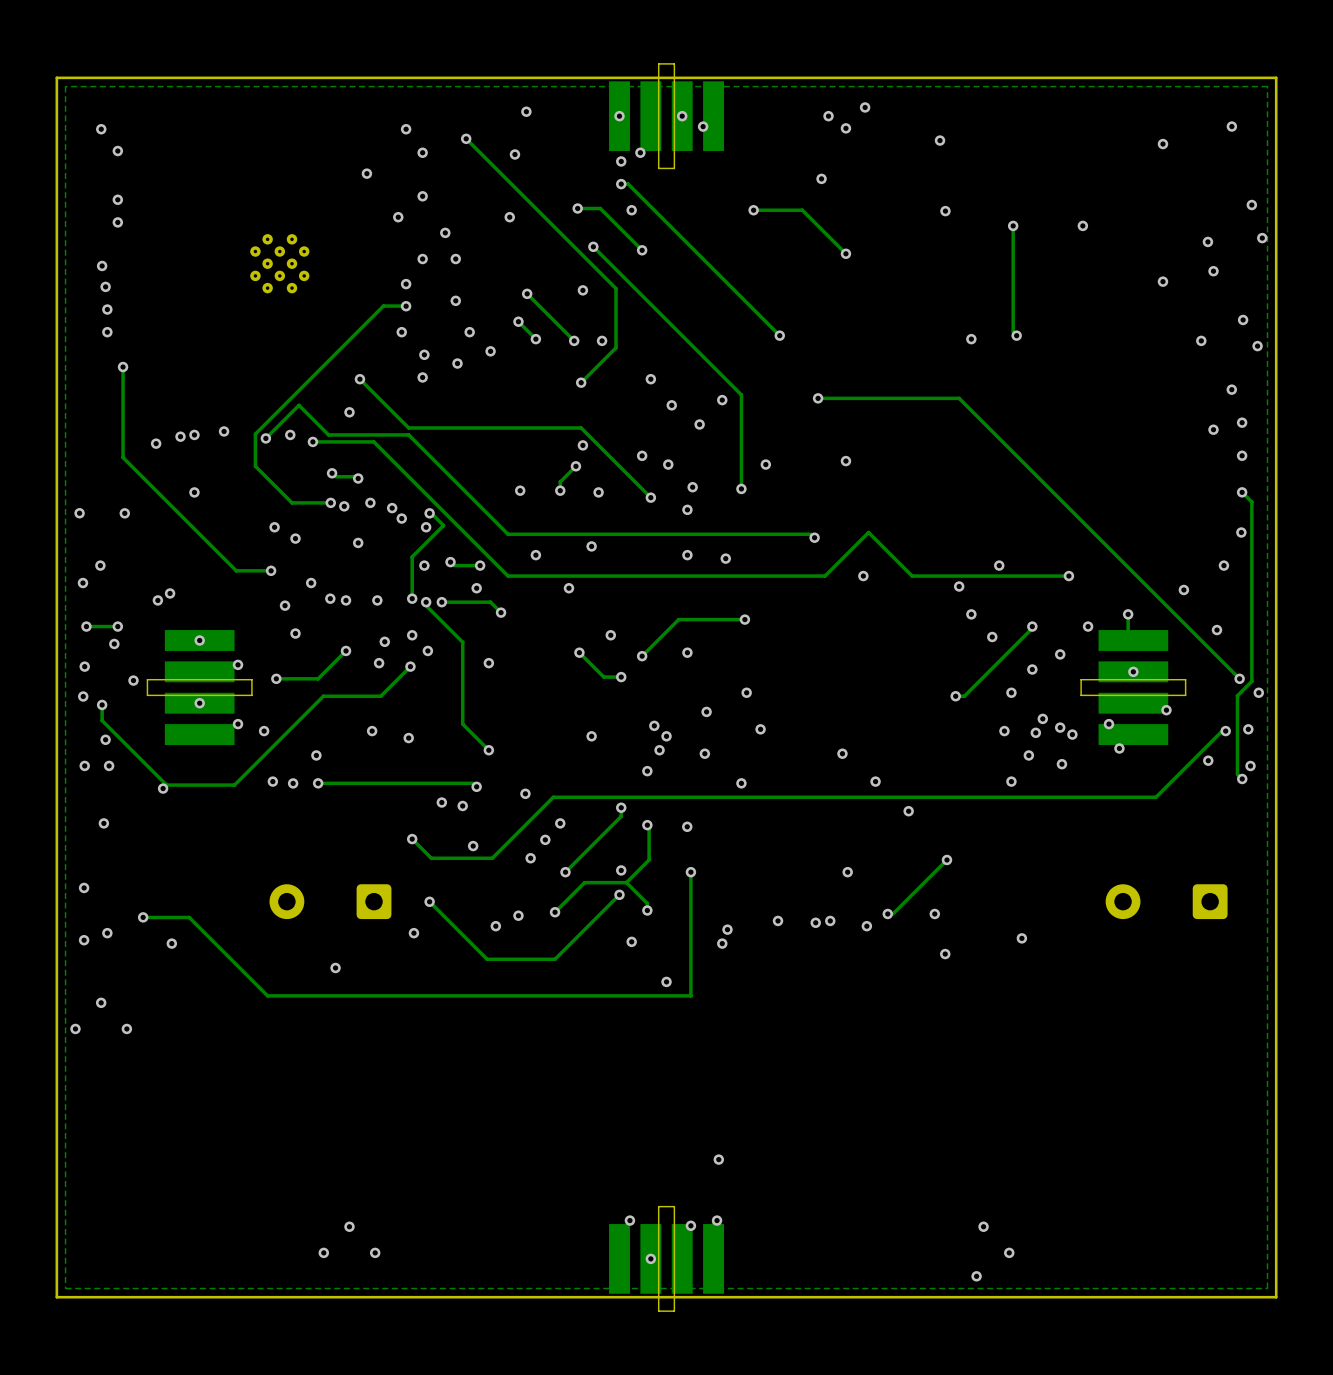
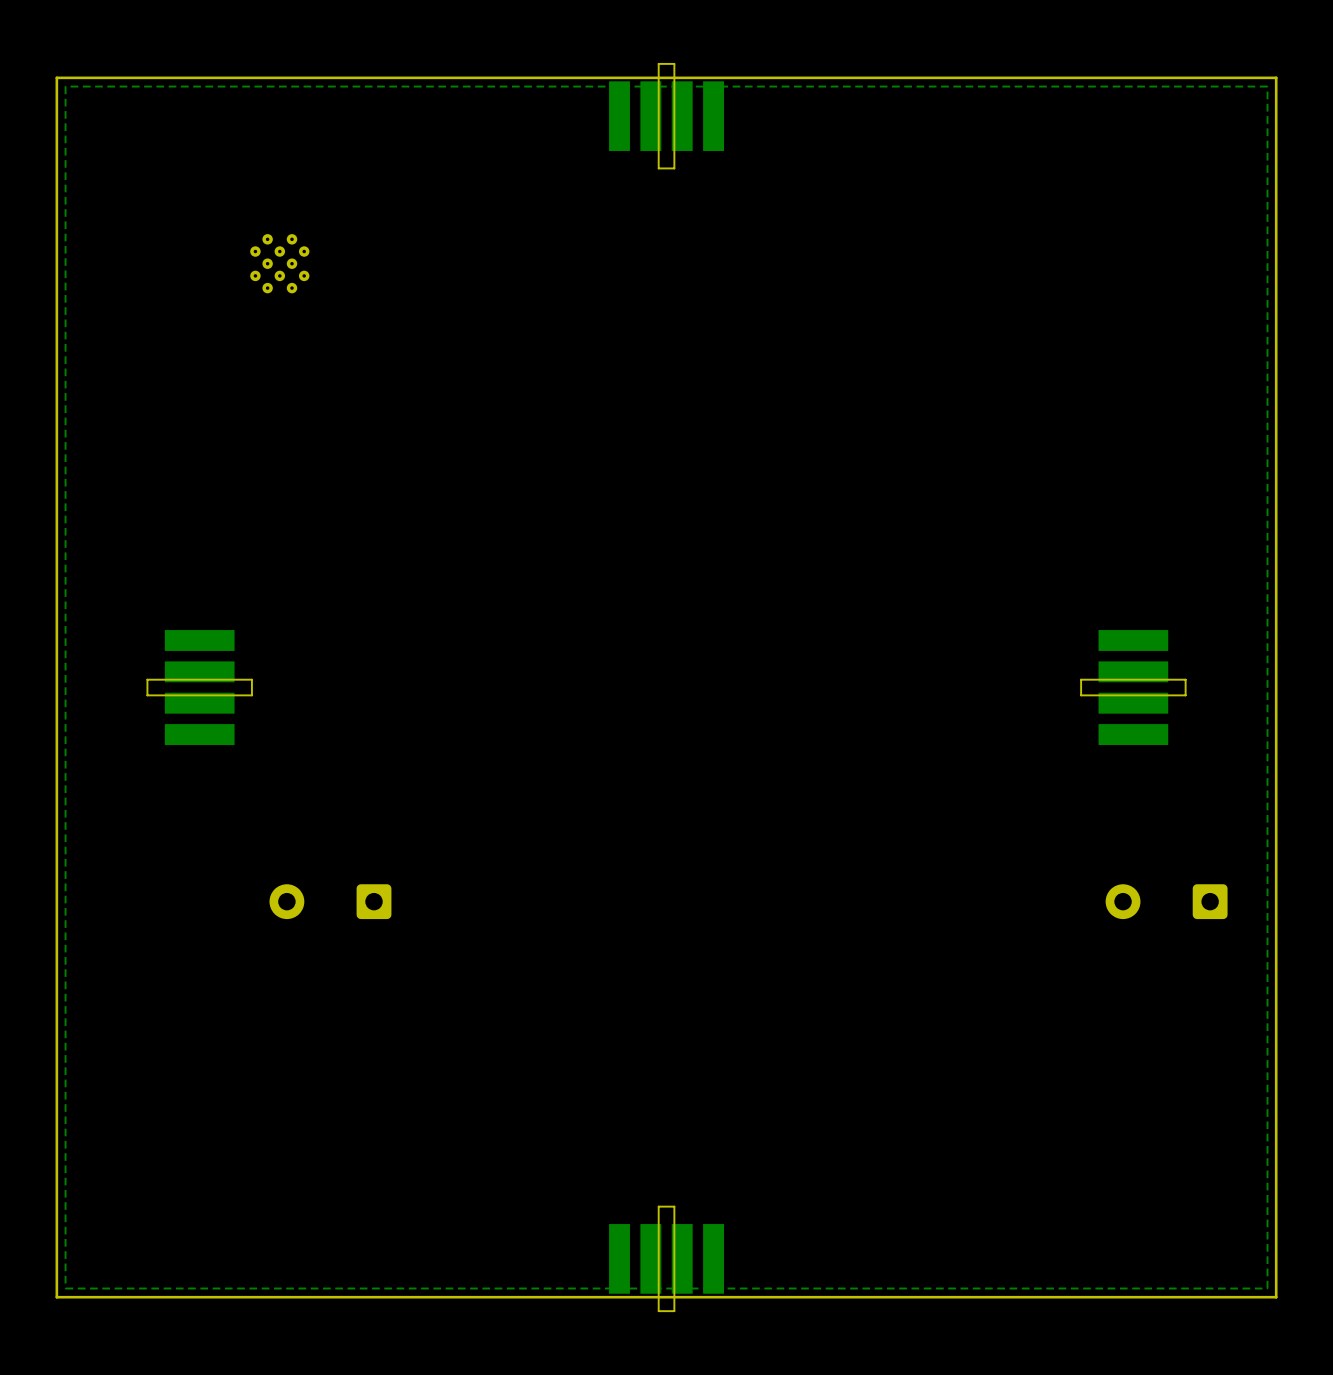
via: (865, 107) -> none
via: (526, 111) -> none
via: (619, 116) -> none
via: (682, 116) -> none
via: (828, 116) -> none
via: (703, 126) -> none
via: (1231, 126) -> none
via: (845, 128) -> none
via: (101, 129) -> none
via: (406, 129) -> none
track: (466, 138) (616, 288) (616, 347) (581, 382) -> none
via: (466, 138) -> none
via: (940, 140) -> none
via: (1162, 144) -> none
via: (117, 151) -> none
via: (422, 152) -> none
via: (640, 152) -> none
via: (514, 154) -> none
via: (621, 161) -> none
via: (366, 173) -> none
via: (821, 178) -> none
track: (621, 184) (628, 184) (779, 335) -> none
via: (621, 184) -> none
via: (422, 196) -> none
via: (117, 199) -> none
via: (1251, 205) -> none
track: (577, 208) (600, 208) (642, 250) -> none
via: (577, 208) -> none
via: (631, 210) -> none
track: (753, 210) (802, 210) (845, 253) -> none
via: (753, 210) -> none
via: (945, 211) -> none
via: (398, 217) -> none
via: (509, 217) -> none
via: (117, 222) -> none
track: (1013, 225) (1013, 332) -> none
via: (1013, 225) -> none
via: (1082, 225) -> none
via: (445, 232) -> none
via: (1262, 238) -> none
via: (1207, 241) -> none
track: (593, 246) (741, 394) (741, 488) -> none
via: (593, 246) -> none
via: (642, 250) -> none
via: (845, 253) -> none
via: (422, 259) -> none
via: (455, 259) -> none
via: (102, 265) -> none
via: (1213, 271) -> none
via: (1162, 281) -> none
via: (406, 284) -> none
via: (105, 286) -> none
via: (582, 290) -> none
track: (527, 293) (574, 340) -> none
via: (527, 293) -> none
via: (455, 300) -> none
track: (406, 306) (383, 306) (255, 434) (255, 466) (292, 502) (330, 502) -> none
via: (406, 306) -> none
via: (107, 309) -> none
via: (1243, 319) -> none
track: (518, 321) (535, 339) -> none
via: (518, 321) -> none
via: (107, 332) -> none
via: (401, 332) -> none
via: (469, 332) -> none
via: (779, 335) -> none
via: (1016, 335) -> none
via: (535, 339) -> none
via: (971, 339) -> none
via: (574, 340) -> none
via: (602, 340) -> none
via: (1201, 340) -> none
via: (1257, 346) -> none
via: (490, 351) -> none
via: (424, 354) -> none
via: (457, 363) -> none
track: (123, 367) (123, 457) (236, 570) (271, 570) -> none
via: (123, 367) -> none
via: (422, 377) -> none
track: (359, 379) (408, 427) (581, 427) (650, 497) -> none
via: (359, 379) -> none
via: (650, 379) -> none
via: (581, 382) -> none
via: (1231, 389) -> none
track: (818, 398) (959, 398) (1239, 678) -> none
via: (818, 398) -> none
via: (722, 400) -> none
via: (671, 405) -> none
via: (349, 412) -> none
via: (1242, 422) -> none
via: (699, 424) -> none
via: (1213, 429) -> none
via: (224, 431) -> none
via: (194, 434) -> none
via: (290, 434) -> none
via: (180, 436) -> none
track: (265, 438) (298, 405) (328, 434) (408, 434) (508, 534) (811, 534) -> none
via: (265, 438) -> none
via: (312, 441) -> none
track: (314, 441) (373, 441) (508, 576) (825, 576) (868, 532) (912, 576) (1068, 576) -> none
via: (156, 443) -> none
via: (582, 445) -> none
via: (642, 455) -> none
via: (1242, 455) -> none
via: (845, 461) -> none
via: (668, 464) -> none
via: (765, 464) -> none
track: (575, 466) (560, 481) (560, 490) -> none
via: (575, 466) -> none
via: (332, 473) -> none
track: (356, 476) (335, 476) -> none
via: (358, 478) -> none
via: (692, 487) -> none
via: (741, 488) -> none
via: (520, 490) -> none
via: (560, 490) -> none
via: (194, 492) -> none
via: (598, 492) -> none
track: (1242, 492) (1251, 502) (1251, 681) (1237, 695) (1237, 774) (1242, 778) -> none
via: (1242, 492) -> none
via: (650, 497) -> none
via: (330, 502) -> none
via: (370, 502) -> none
via: (344, 506) -> none
via: (392, 508) -> none
via: (687, 509) -> none
via: (79, 513) -> none
via: (124, 513) -> none
via: (429, 513) -> none
track: (431, 513) (443, 525) (412, 556) (412, 598) -> none
via: (401, 518) -> none
via: (274, 527) -> none
via: (426, 527) -> none
via: (1241, 532) -> none
via: (814, 537) -> none
via: (295, 538) -> none
via: (358, 542) -> none
via: (591, 546) -> none
via: (535, 555) -> none
via: (687, 555) -> none
via: (725, 558) -> none
via: (450, 562) -> none
via: (100, 565) -> none
via: (424, 565) -> none
track: (480, 565) (454, 565) -> none
via: (480, 565) -> none
via: (999, 565) -> none
via: (1223, 565) -> none
via: (271, 570) -> none
via: (863, 576) -> none
via: (1068, 576) -> none
via: (82, 583) -> none
via: (311, 583) -> none
via: (959, 586) -> none
via: (476, 588) -> none
via: (568, 588) -> none
via: (1183, 589) -> none
via: (170, 593) -> none
via: (330, 598) -> none
via: (412, 598) -> none
via: (157, 600) -> none
via: (346, 600) -> none
via: (377, 600) -> none
via: (426, 602) -> none
track: (441, 602) (490, 602) (501, 612) -> none
via: (441, 602) -> none
via: (285, 605) -> none
track: (426, 605) (462, 642) (462, 724) (488, 750) -> none
via: (501, 612) -> none
via: (971, 614) -> none
track: (1128, 614) (1128, 635) -> none
via: (1128, 614) -> none
track: (744, 619) (678, 619) (642, 656) -> none
via: (744, 619) -> none
via: (86, 626) -> none
track: (117, 626) (86, 626) -> none
via: (117, 626) -> none
via: (1032, 626) -> none
via: (1088, 626) -> none
track: (1032, 628) (964, 696) (955, 696) -> none
via: (1216, 630) -> none
via: (295, 633) -> none
via: (412, 635) -> none
via: (610, 635) -> none
via: (992, 637) -> none
via: (199, 640) -> none
via: (384, 641) -> none
via: (114, 643) -> none
track: (346, 650) (318, 678) (276, 678) -> none
via: (346, 650) -> none
via: (427, 650) -> none
track: (579, 652) (603, 677) (621, 677) -> none
via: (579, 652) -> none
via: (687, 652) -> none
via: (1060, 654) -> none
via: (642, 656) -> none
via: (379, 663) -> none
via: (488, 663) -> none
via: (238, 664) -> none
via: (84, 666) -> none
track: (410, 666) (380, 696) (323, 696) (234, 785) (166, 785) (102, 720) (102, 704) -> none
via: (410, 666) -> none
via: (1032, 669) -> none
via: (1133, 671) -> none
via: (621, 677) -> none
via: (276, 678) -> none
via: (1239, 678) -> none
via: (133, 680) -> none
via: (746, 692) -> none
via: (1011, 692) -> none
via: (1258, 692) -> none
via: (83, 696) -> none
via: (955, 696) -> none
via: (199, 703) -> none
via: (102, 704) -> none
via: (1166, 710) -> none
via: (706, 711) -> none
via: (1042, 718) -> none
via: (238, 724) -> none
via: (1108, 724) -> none
via: (654, 725) -> none
via: (1060, 727) -> none
via: (760, 729) -> none
via: (1248, 729) -> none
via: (264, 731) -> none
via: (372, 731) -> none
via: (1004, 731) -> none
track: (1222, 731) (1156, 797) (553, 797) (492, 858) (431, 858) (412, 839) -> none
via: (1225, 731) -> none
via: (1035, 732) -> none
via: (1072, 734) -> none
via: (591, 736) -> none
via: (666, 736) -> none
via: (408, 738) -> none
via: (105, 739) -> none
via: (1119, 748) -> none
via: (488, 750) -> none
via: (659, 750) -> none
via: (704, 753) -> none
via: (842, 753) -> none
via: (316, 755) -> none
via: (1028, 755) -> none
via: (1208, 760) -> none
via: (1061, 764) -> none
via: (84, 765) -> none
via: (109, 765) -> none
via: (1250, 766) -> none
via: (647, 771) -> none
via: (1242, 778) -> none
via: (272, 781) -> none
via: (875, 781) -> none
via: (1011, 781) -> none
via: (293, 783) -> none
via: (318, 783) -> none
track: (473, 783) (318, 783) -> none
via: (741, 783) -> none
via: (476, 786) -> none
via: (163, 788) -> none
via: (525, 793) -> none
via: (441, 802) -> none
via: (462, 805) -> none
track: (621, 807) (621, 816) (565, 872) -> none
via: (621, 807) -> none
via: (908, 811) -> none
via: (103, 823) -> none
via: (560, 823) -> none
via: (647, 825) -> none
track: (649, 826) (649, 859) (626, 882) -> none
via: (687, 826) -> none
via: (412, 839) -> none
via: (545, 839) -> none
via: (473, 846) -> none
via: (530, 858) -> none
track: (946, 859) (892, 913) -> none
via: (946, 859) -> none
via: (621, 870) -> none
via: (565, 872) -> none
track: (690, 872) (690, 995) (267, 995) (189, 917) (143, 917) -> none
via: (690, 872) -> none
via: (847, 872) -> none
track: (626, 882) (647, 903) (647, 910) -> none
track: (626, 882) (584, 882) (555, 912) -> none
via: (84, 887) -> none
track: (619, 894) (555, 959) (487, 959) (429, 901) -> none
via: (619, 894) -> none
via: (429, 901) -> none
via: (647, 910) -> none
via: (555, 912) -> none
via: (887, 913) -> none
via: (934, 913) -> none
via: (518, 915) -> none
via: (143, 917) -> none
via: (778, 920) -> none
via: (830, 920) -> none
via: (815, 922) -> none
via: (495, 926) -> none
via: (866, 926) -> none
via: (727, 929) -> none
via: (107, 933) -> none
via: (413, 933) -> none
via: (1021, 938) -> none
via: (84, 940) -> none
via: (631, 941) -> none
via: (171, 943) -> none
via: (722, 943) -> none
via: (945, 954) -> none
via: (335, 967) -> none
via: (666, 981) -> none
via: (101, 1002) -> none
via: (75, 1028) -> none
via: (126, 1028) -> none
via: (718, 1159) -> none
via: (629, 1220) -> none
via: (717, 1220) -> none
via: (690, 1225) -> none
via: (349, 1226) -> none
via: (983, 1226) -> none
via: (323, 1252) -> none
via: (375, 1252) -> none
via: (1009, 1252) -> none
via: (650, 1258) -> none
via: (976, 1276) -> none

